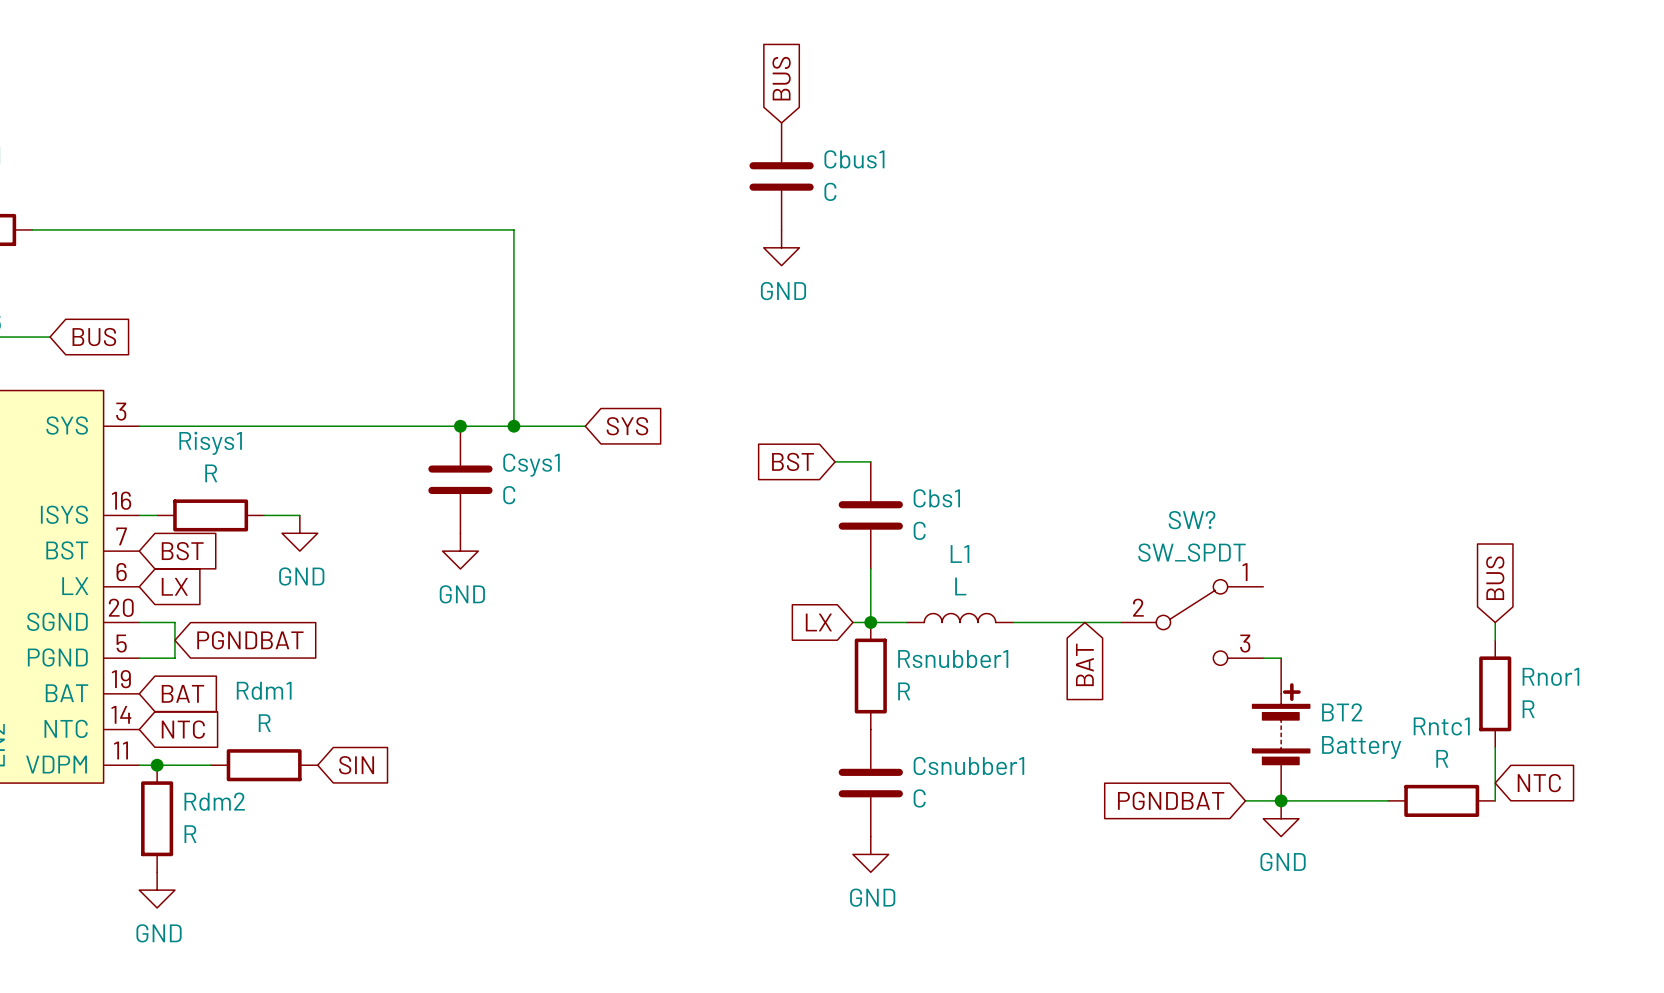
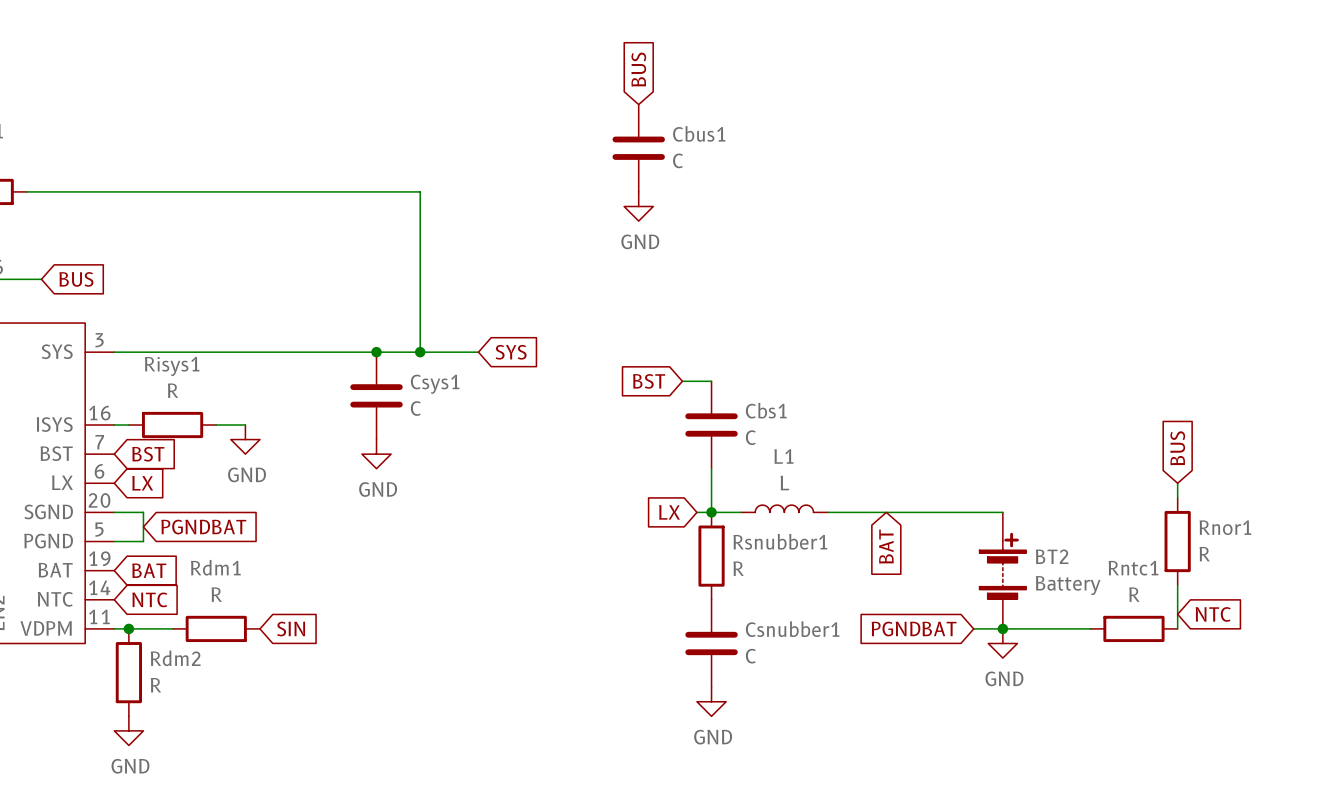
global label position: BUS (1495, 578) -> BUS (1177, 448)
wire: none -> (915, 512) (1002, 512)
SW?: SW_SPDT (1191, 622) -> none
wire: (1495, 622) (1495, 640) -> (1177, 483) (1177, 497)
wire: (1263, 658) (1281, 658) -> none
Rnor1 position: (1495, 693) -> (1177, 541)
BT2 position: (1281, 729) -> (1002, 570)
wire: (1495, 747) (1495, 800) -> (1177, 585) (1177, 628)
global label position: NTC (1539, 783) -> NTC (1213, 614)
global label position: PGNDBAT (1171, 800) -> PGNDBAT (914, 629)
wire: (1245, 800) (1388, 800) -> (973, 628) (1090, 628)
junction position: (1281, 800) -> (1002, 628)
Rntc1 position: (1441, 800) -> (1133, 628)
power symbol position: GND (1281, 818) -> GND (1002, 643)

